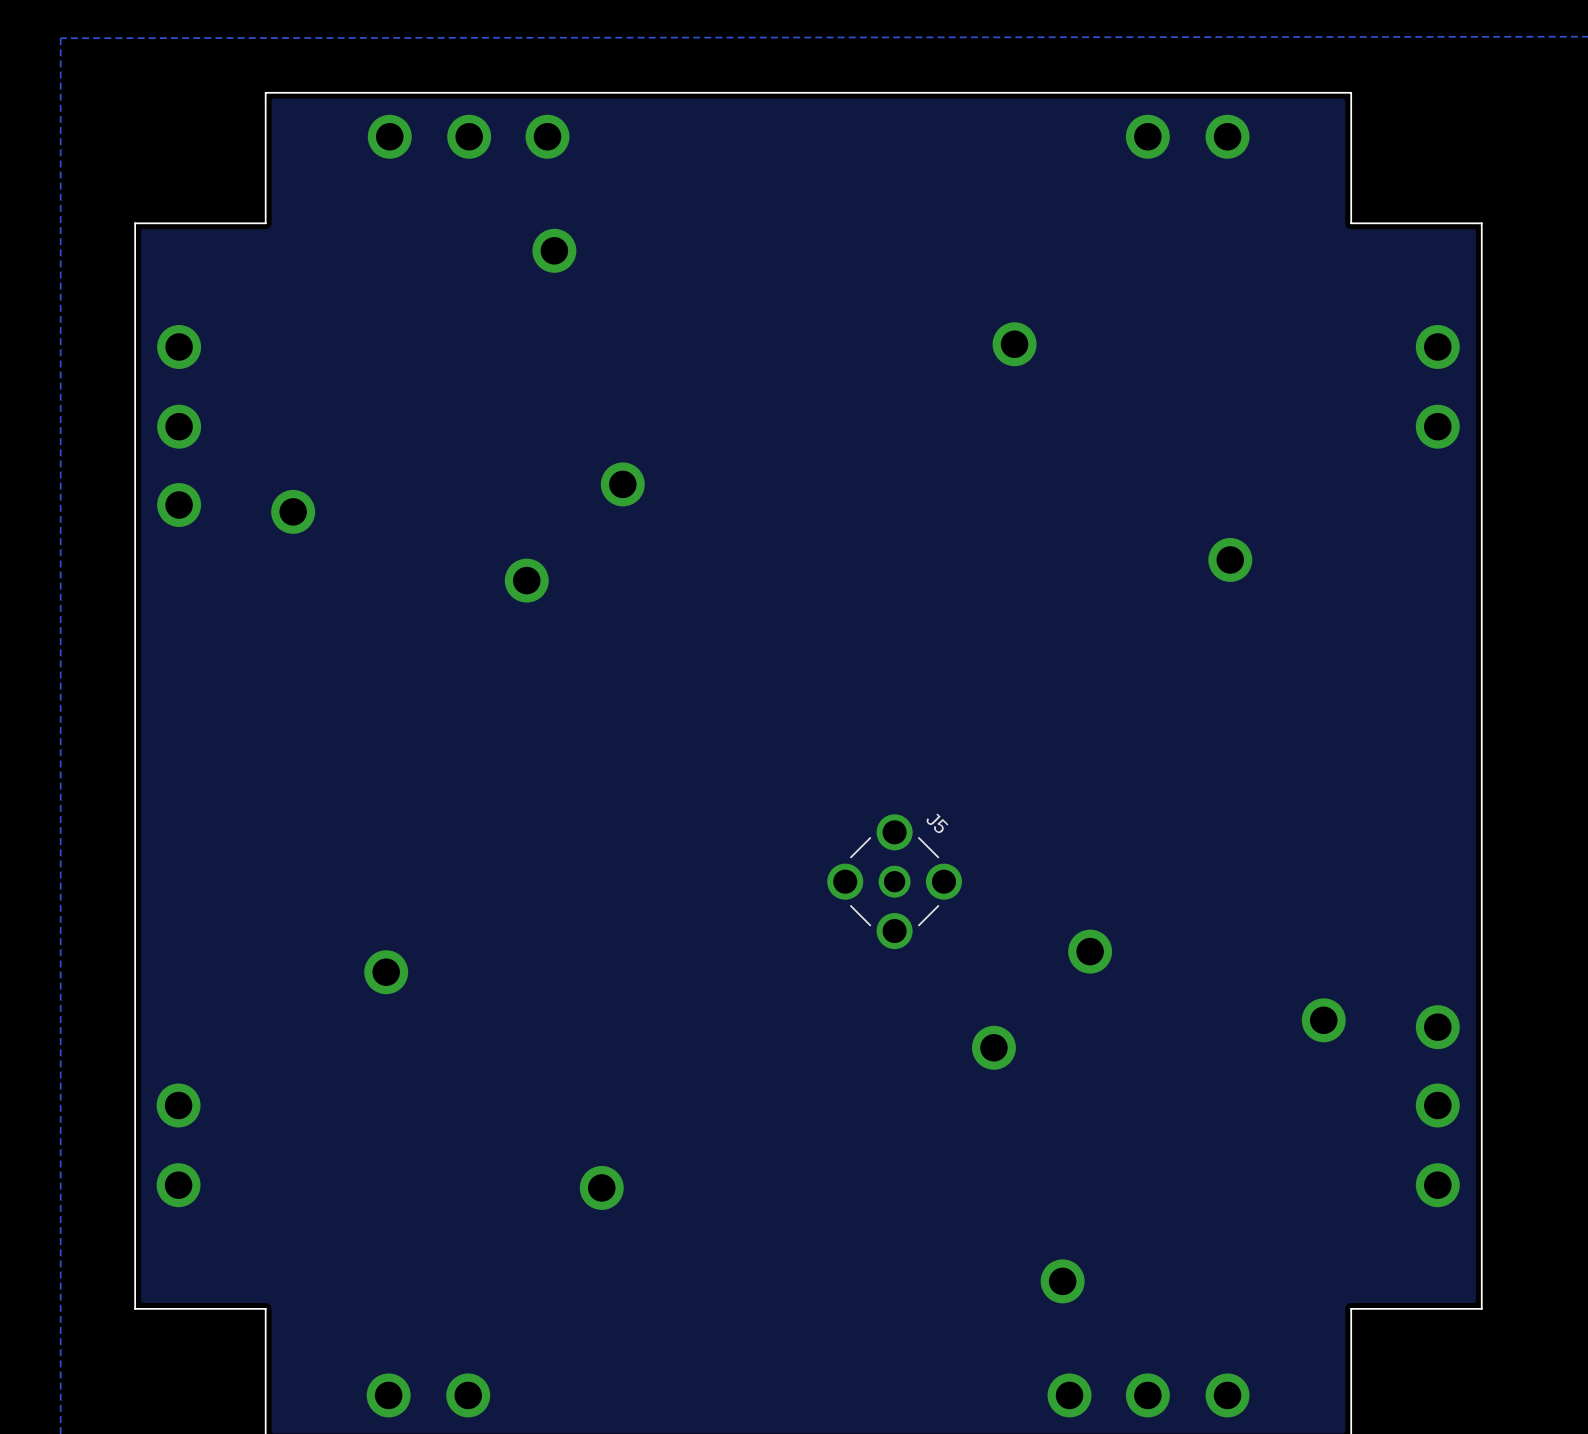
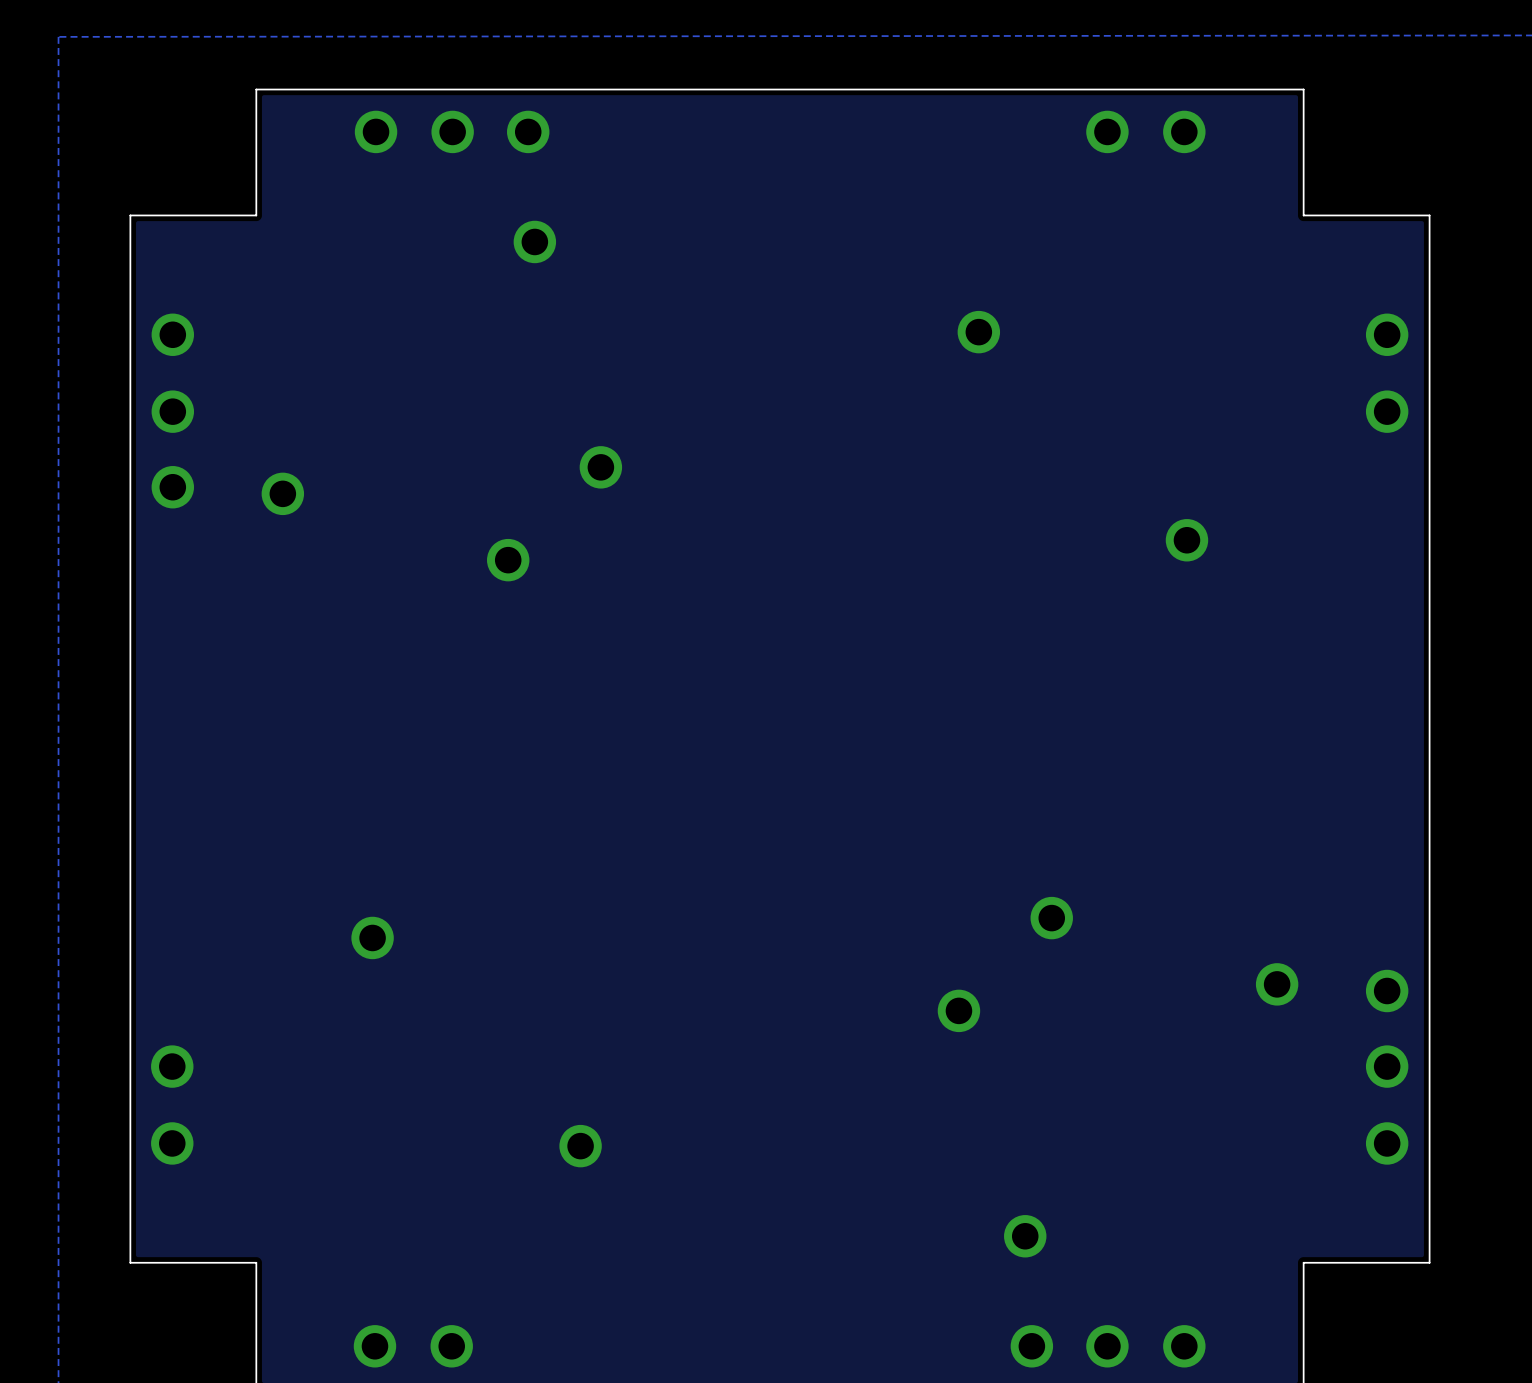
J5: (894, 881) -> none

